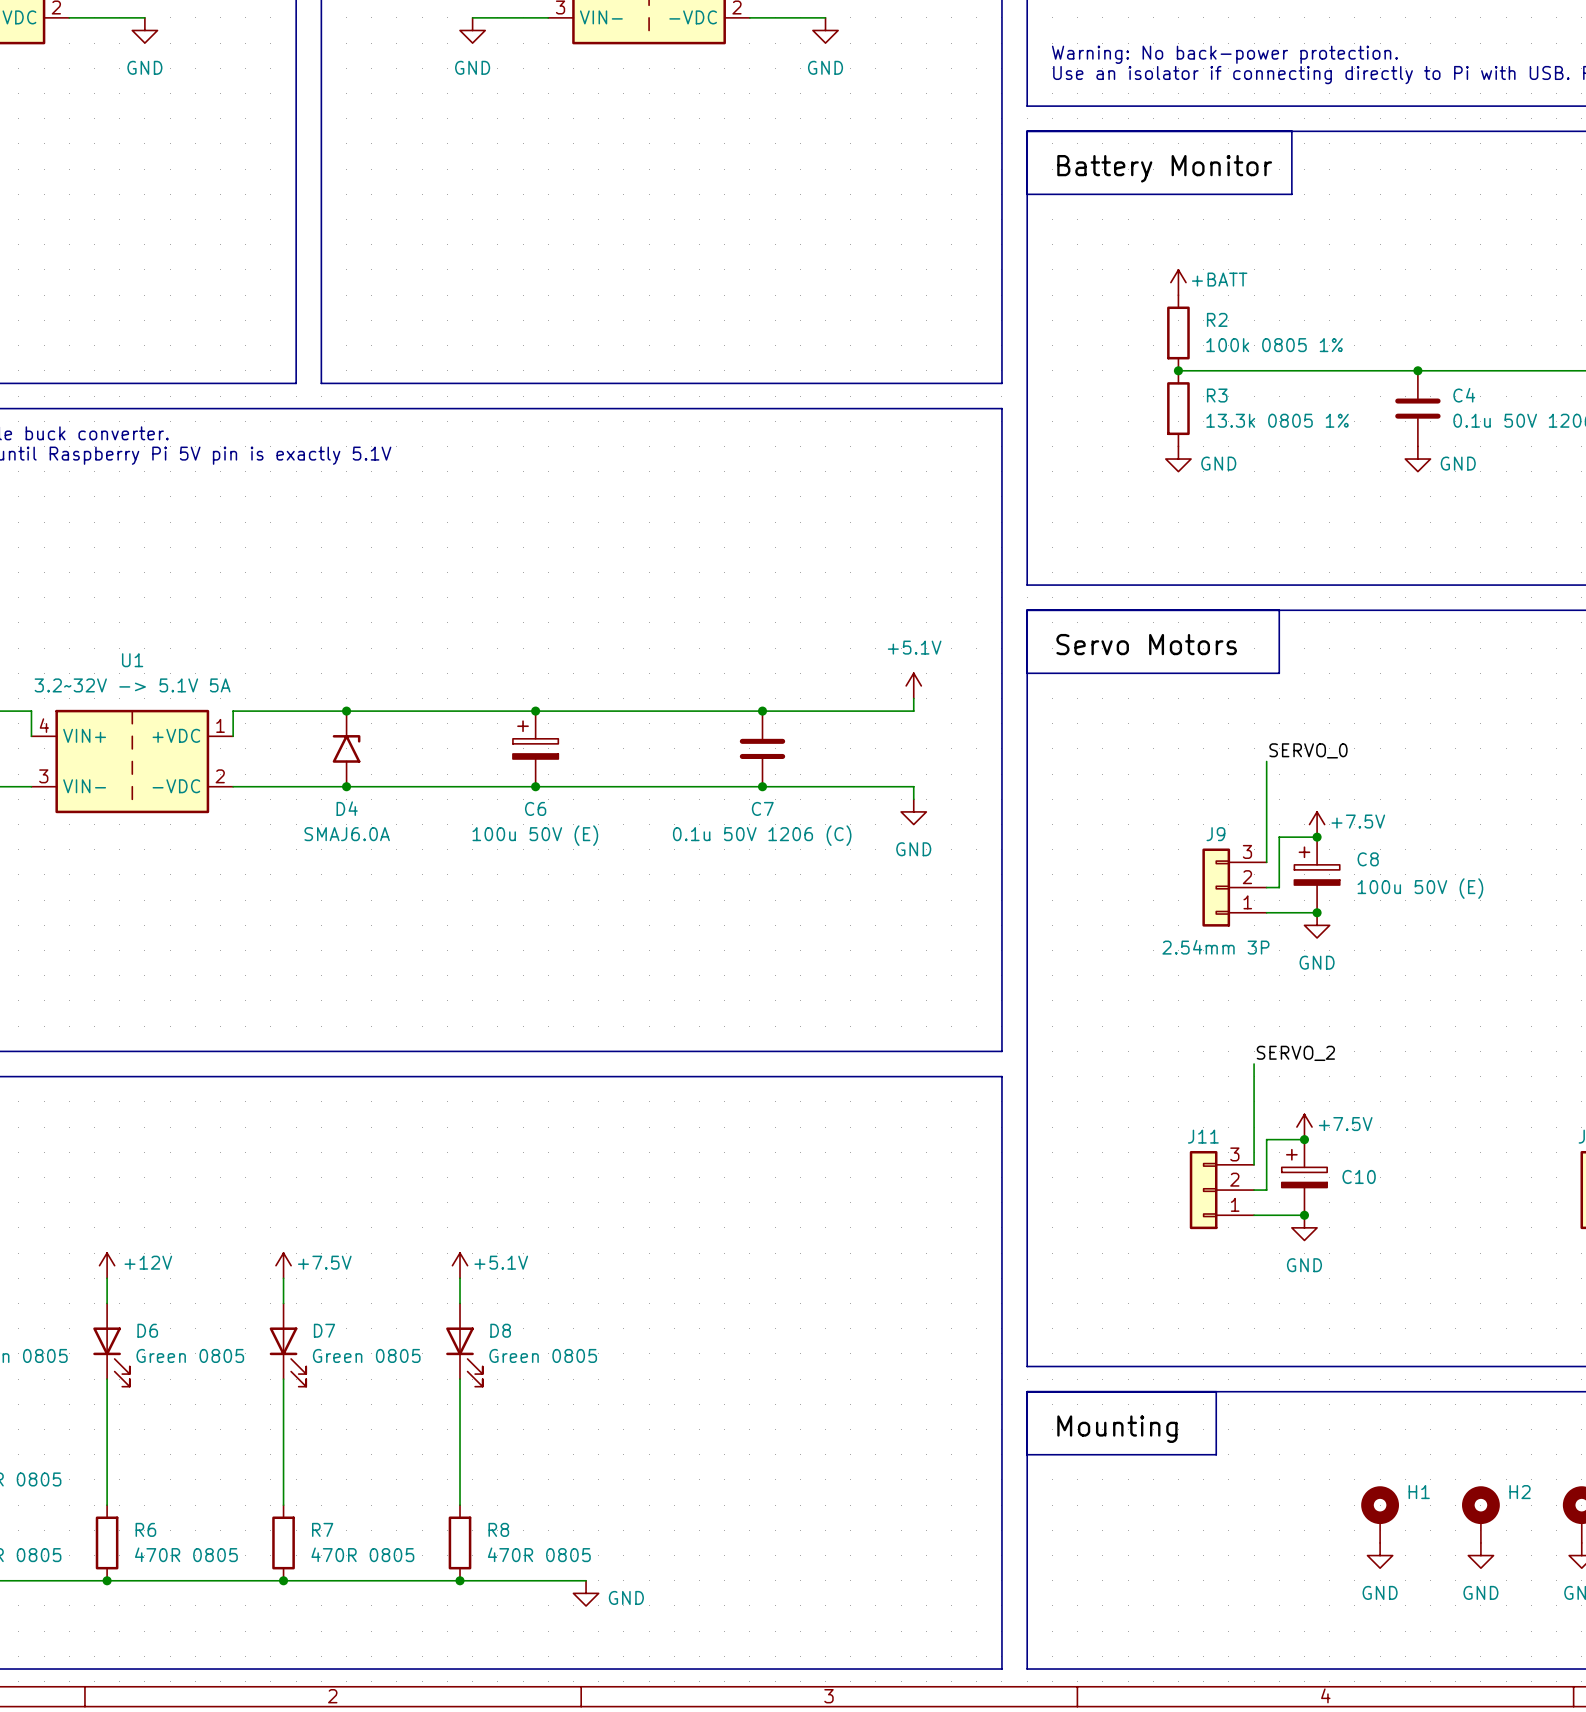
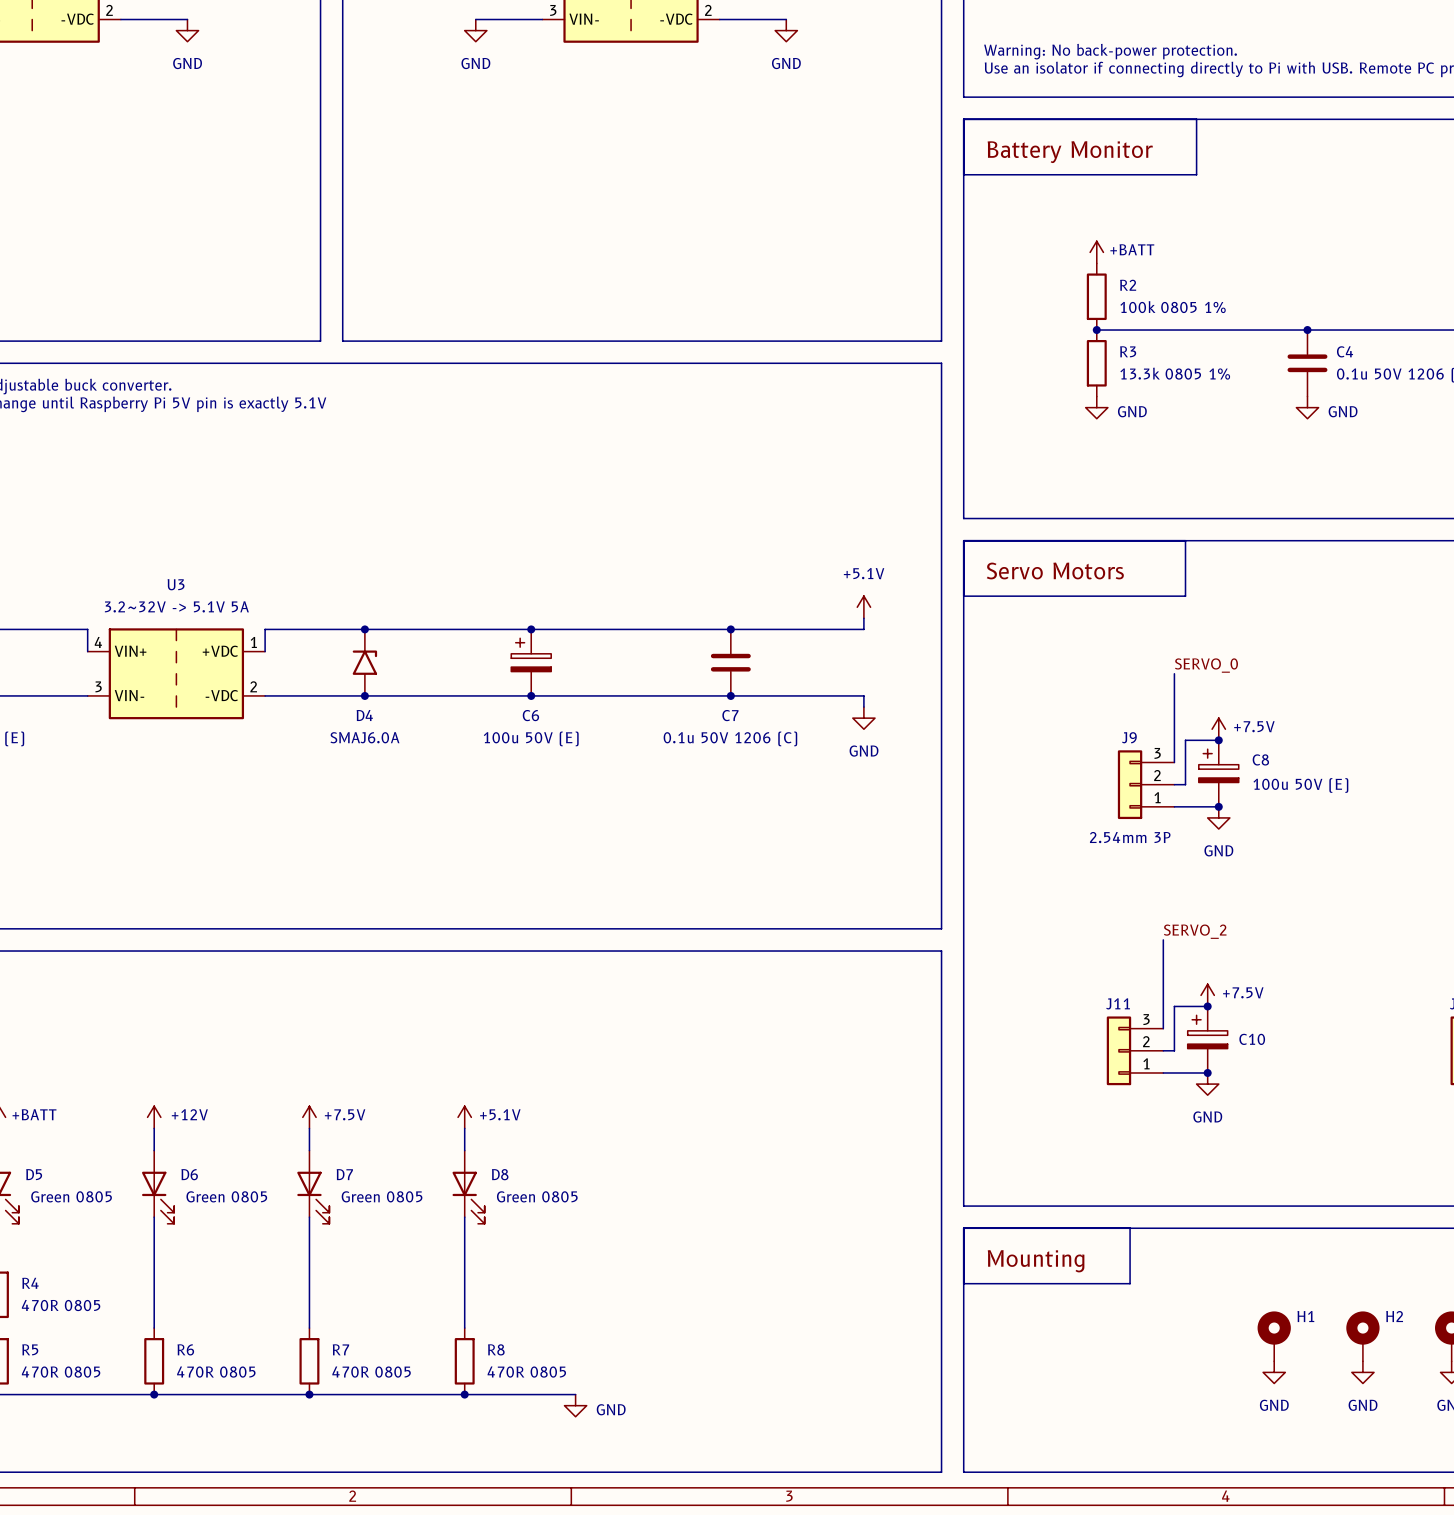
U1 name: U1 (132, 660) -> U3 (176, 584)

